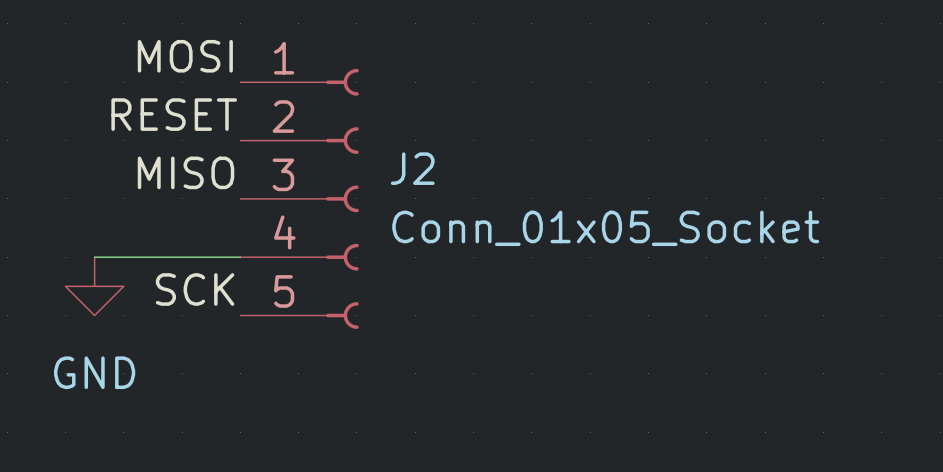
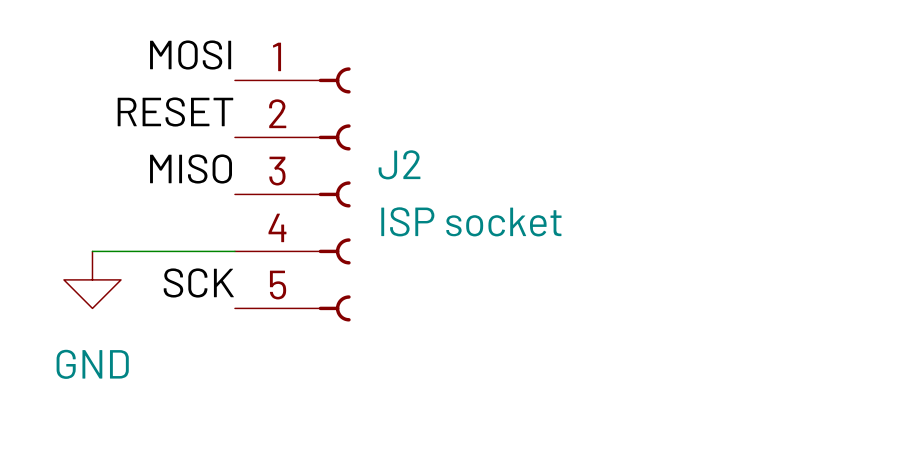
J2 value: Conn_01x05_Socket (605, 228) -> ISP socket (471, 221)

